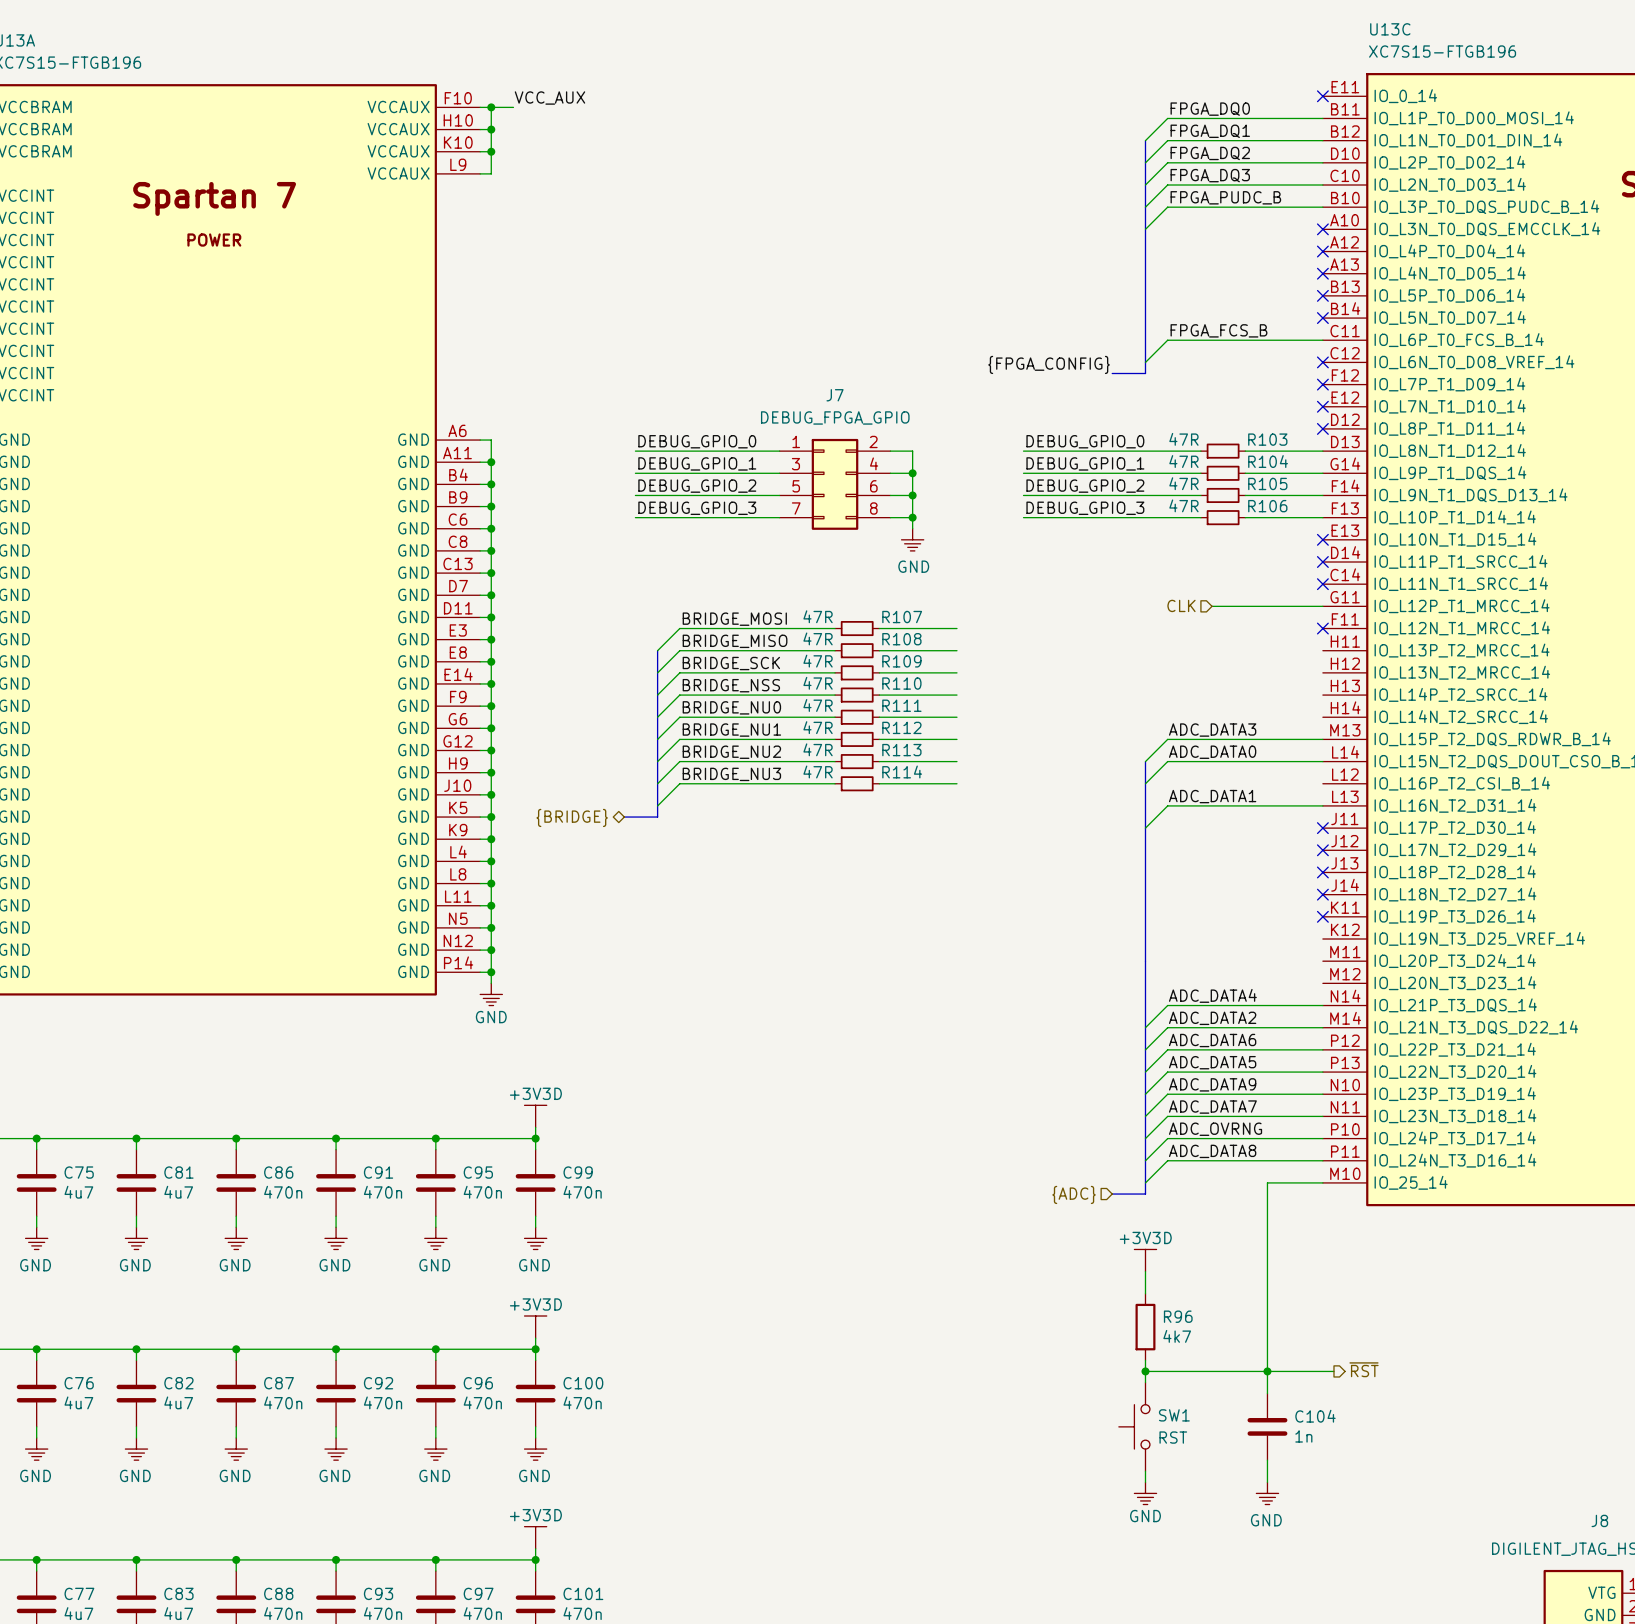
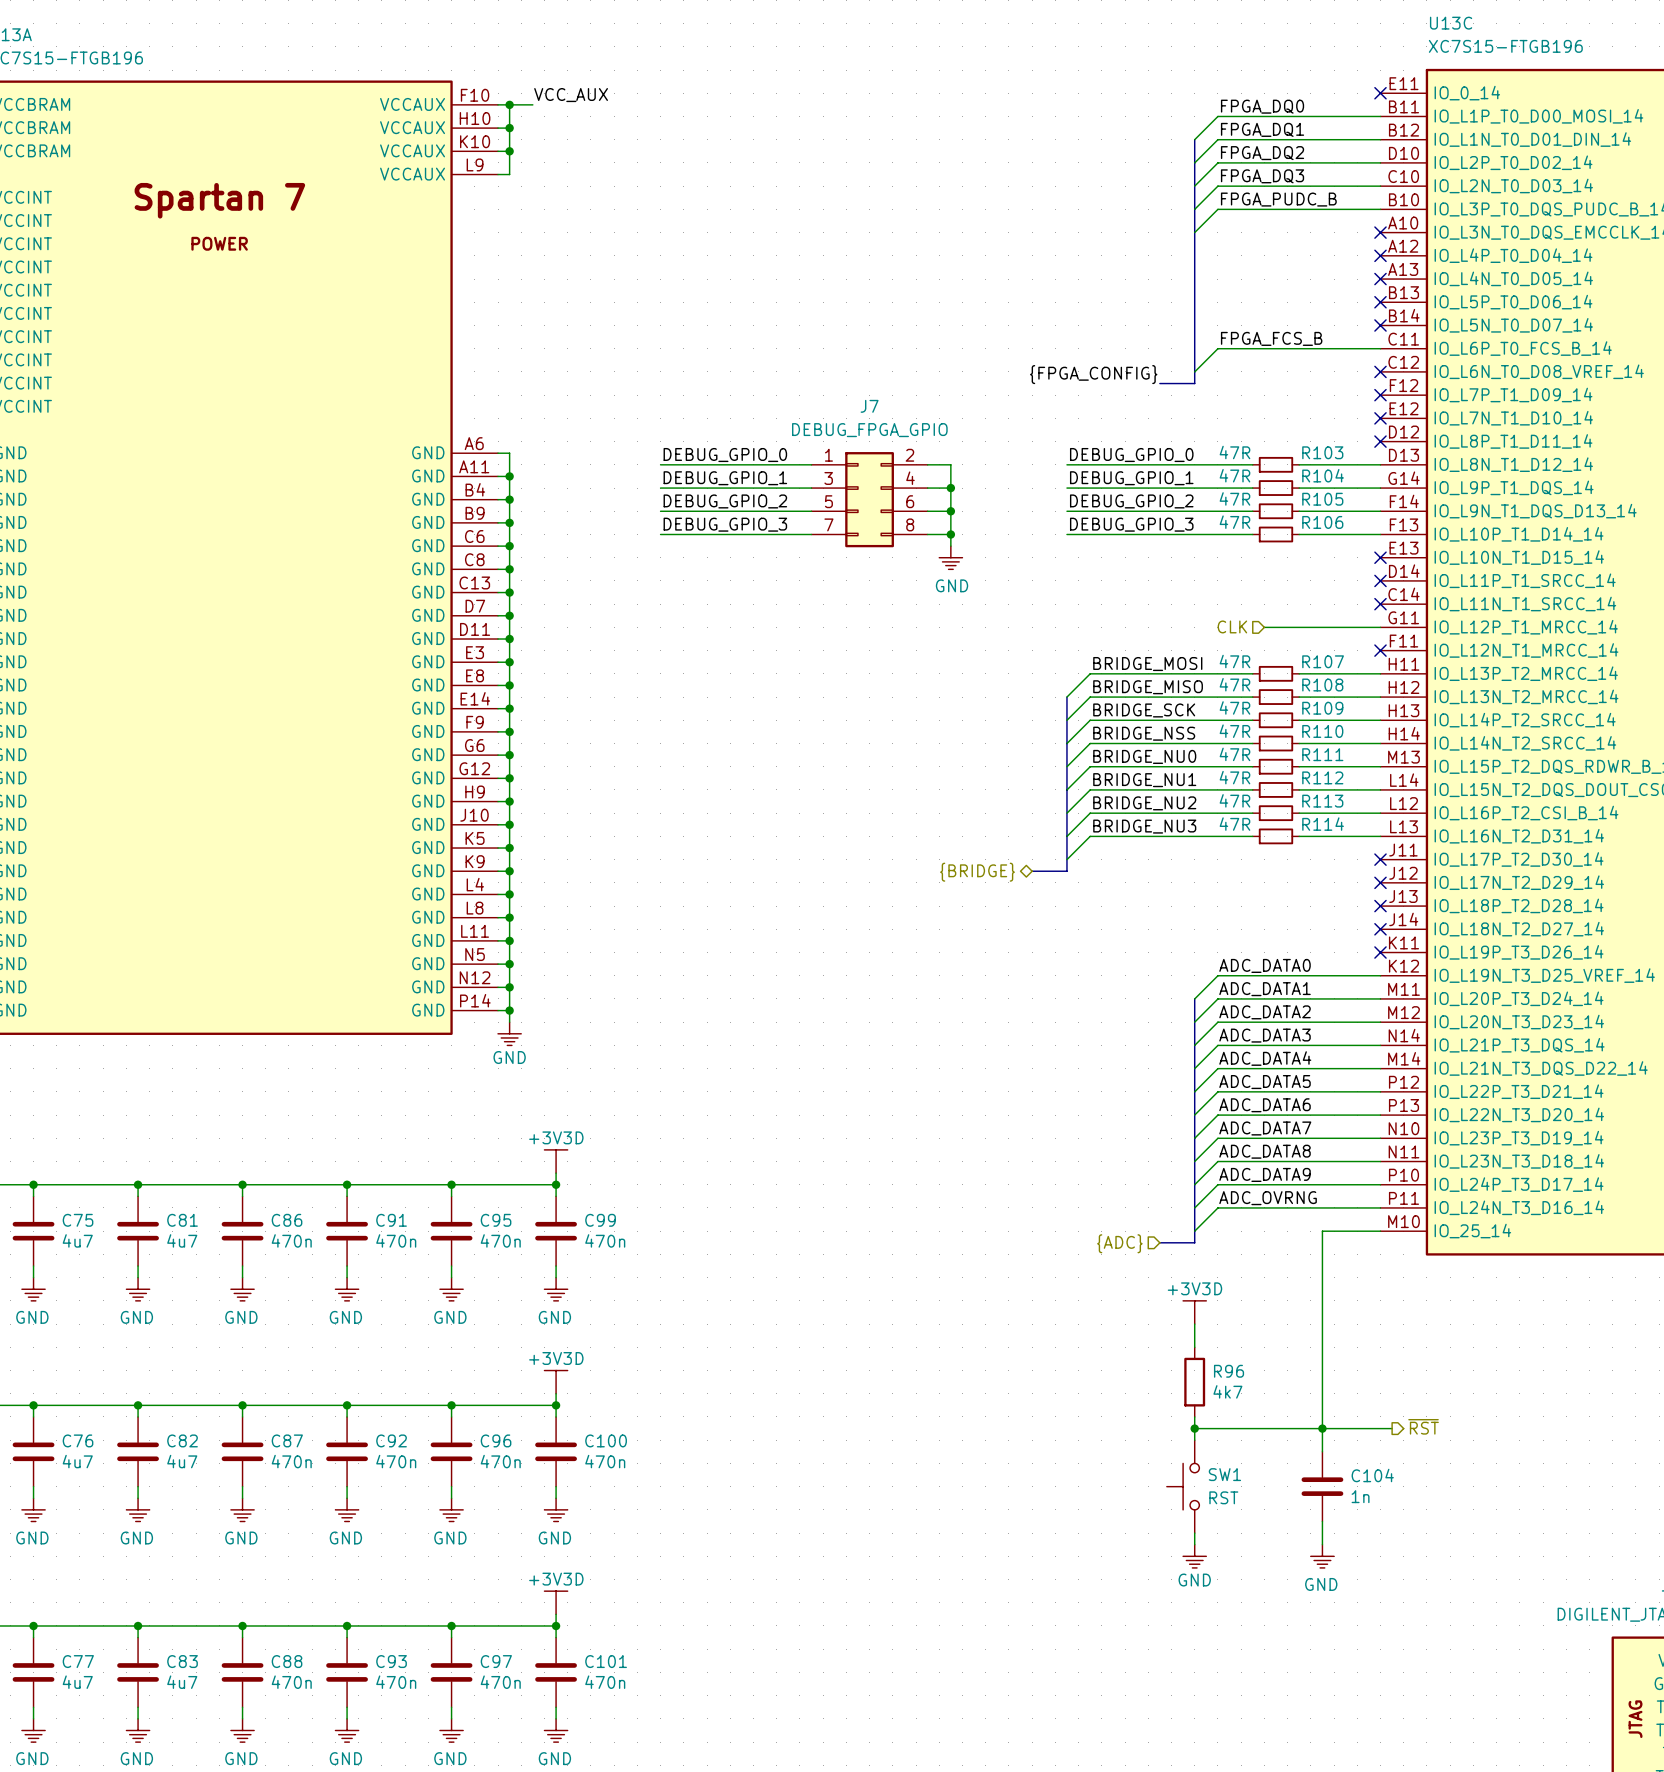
label: BRIDGE_MOSI (734, 619) -> none
wire: (835, 628) (679, 628) (657, 650) -> none
R107 position: (857, 628) -> (1275, 673)
wire: (879, 628) (956, 628) -> none
label: BRIDGE_MISO (735, 641) -> none
label: none -> BRIDGE_MOSI (1147, 664)
bus: (657, 650) (657, 817) (624, 817) -> none
wire: (835, 650) (679, 650) (657, 672) -> none
R108 position: (857, 650) -> (1275, 697)
wire: (879, 650) (956, 650) -> none
wire: none -> (1252, 673) (1090, 673) (1066, 697)
wire: none -> (1299, 673) (1380, 673)
label: BRIDGE_SCK (731, 663) -> none
label: none -> BRIDGE_MISO (1148, 687)
wire: (835, 672) (679, 672) (657, 695) -> none
R109 position: (857, 672) -> (1275, 720)
wire: (879, 672) (956, 672) -> none
bus: none -> (1066, 697) (1066, 871) (1032, 871)
wire: none -> (1252, 697) (1090, 697) (1066, 720)
wire: none -> (1299, 697) (1380, 697)
label: BRIDGE_NSS (731, 685) -> none
label: none -> BRIDGE_SCK (1144, 710)
wire: (835, 695) (679, 695) (657, 717) -> none
R110 position: (857, 695) -> (1275, 743)
wire: (879, 695) (956, 695) -> none
wire: none -> (1252, 720) (1090, 720) (1066, 743)
wire: none -> (1299, 720) (1380, 720)
label: BRIDGE_NU0 (731, 707) -> none
label: none -> BRIDGE_NSS (1144, 733)
wire: (835, 717) (679, 717) (657, 739) -> none
R111 position: (857, 717) -> (1275, 766)
wire: (879, 717) (956, 717) -> none
wire: none -> (1252, 743) (1090, 743) (1066, 766)
wire: none -> (1299, 743) (1380, 743)
label: BRIDGE_NU1 (731, 730) -> none
label: none -> BRIDGE_NU0 (1144, 756)
label: ADC_DATA3 (1212, 730) -> none
wire: (835, 739) (679, 739) (657, 761) -> none
R112 position: (857, 739) -> (1275, 789)
wire: (879, 739) (956, 739) -> none
wire: (1167, 739) (1145, 761) -> (1217, 766) (1090, 766) (1066, 789)
wire: (1200, 739) (1245, 739) -> none
label: BRIDGE_NU2 (731, 752) -> none
label: none -> BRIDGE_NU1 (1144, 780)
label position: ADC_DATA0 (1212, 752) -> ADC_DATA0 (1265, 965)
wire: (835, 761) (679, 761) (657, 783) -> none
R113 position: (857, 761) -> (1275, 813)
wire: (879, 761) (956, 761) -> none
bus: (1145, 761) (1145, 961) -> none
wire: (1167, 761) (1145, 783) -> (1217, 789) (1090, 789) (1066, 813)
wire: (1200, 761) (1245, 761) -> none
label: BRIDGE_NU3 (731, 774) -> none
label: none -> BRIDGE_NU2 (1144, 803)
wire: (835, 783) (679, 783) (657, 805) -> none
R114 position: (857, 783) -> (1275, 836)
wire: (879, 783) (956, 783) -> none
wire: none -> (1252, 813) (1090, 813) (1066, 836)
wire: none -> (1299, 813) (1380, 813)
label: none -> BRIDGE_NU3 (1144, 826)
label position: ADC_DATA1 (1212, 796) -> ADC_DATA1 (1265, 989)
wire: (1167, 805) (1145, 828) -> (1217, 836) (1090, 836) (1066, 859)
wire: (1200, 805) (1245, 805) -> none
hierarchical label: {BRIDGE} (572, 817) -> none
hierarchical label: none -> {BRIDGE} (977, 872)
wire: none -> (1380, 975) (1217, 975) (1194, 998)
wire: none -> (1380, 998) (1217, 998) (1194, 1022)
label: none -> ADC_DATA2 (1265, 1012)
wire: none -> (1380, 1022) (1217, 1022) (1194, 1045)
label: ADC_DATA4 (1212, 995) -> ADC_DATA3 (1265, 1035)
label: ADC_DATA2 (1212, 1018) -> ADC_DATA4 (1265, 1058)
label: ADC_DATA6 (1212, 1040) -> ADC_DATA5 (1265, 1082)
label: ADC_DATA5 (1212, 1062) -> ADC_DATA6 (1265, 1105)
label: ADC_DATA9 (1212, 1084) -> ADC_DATA7 (1265, 1128)
label: ADC_DATA7 (1212, 1107) -> ADC_DATA8 (1265, 1151)
label: ADC_OVRNG (1215, 1129) -> ADC_DATA9 (1265, 1174)
label: ADC_DATA8 (1212, 1151) -> ADC_OVRNG (1268, 1198)

